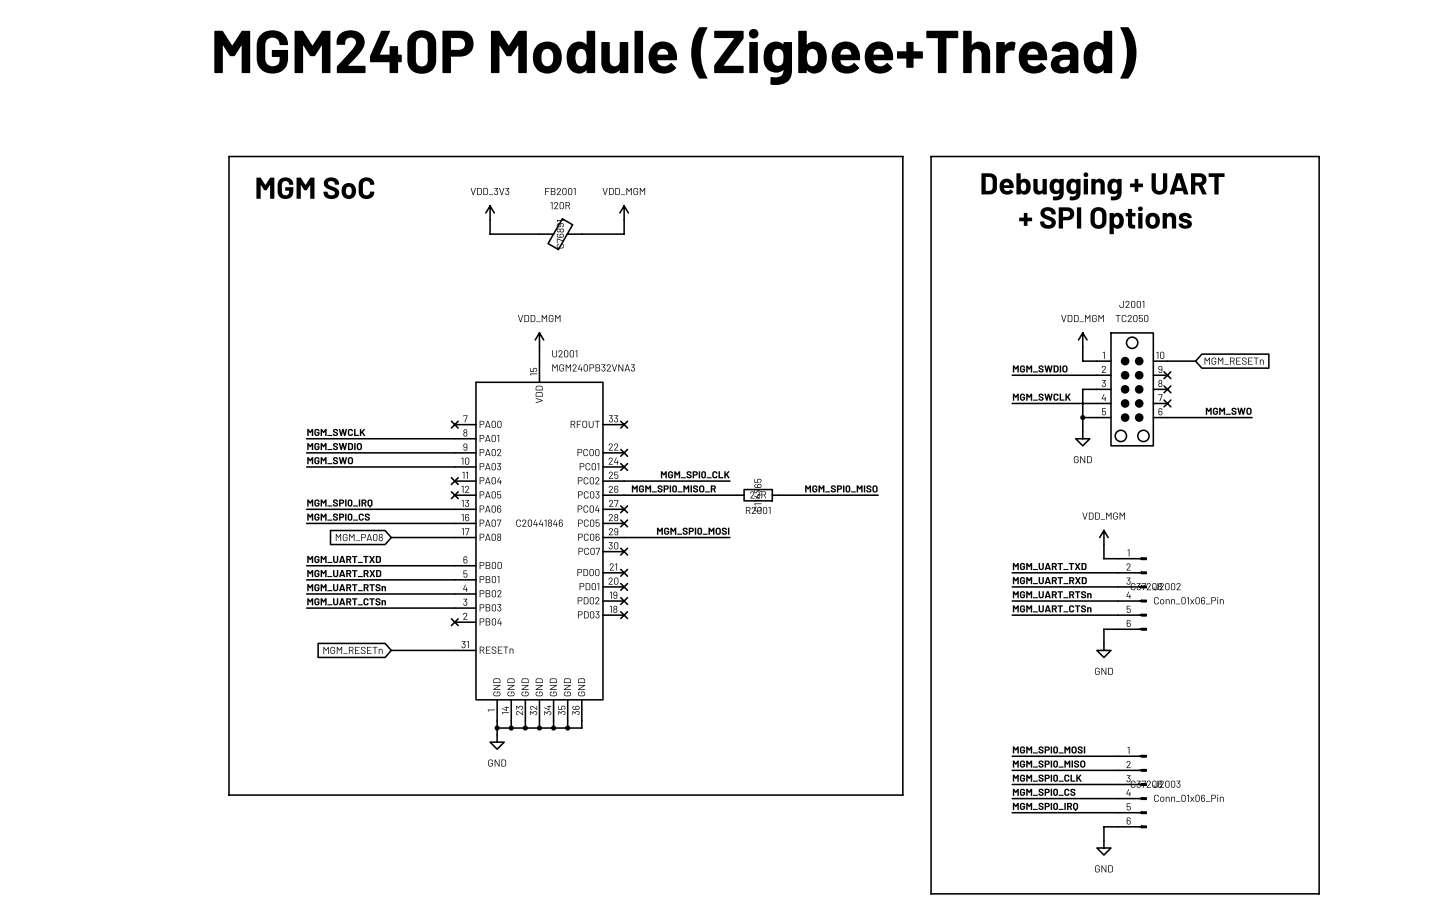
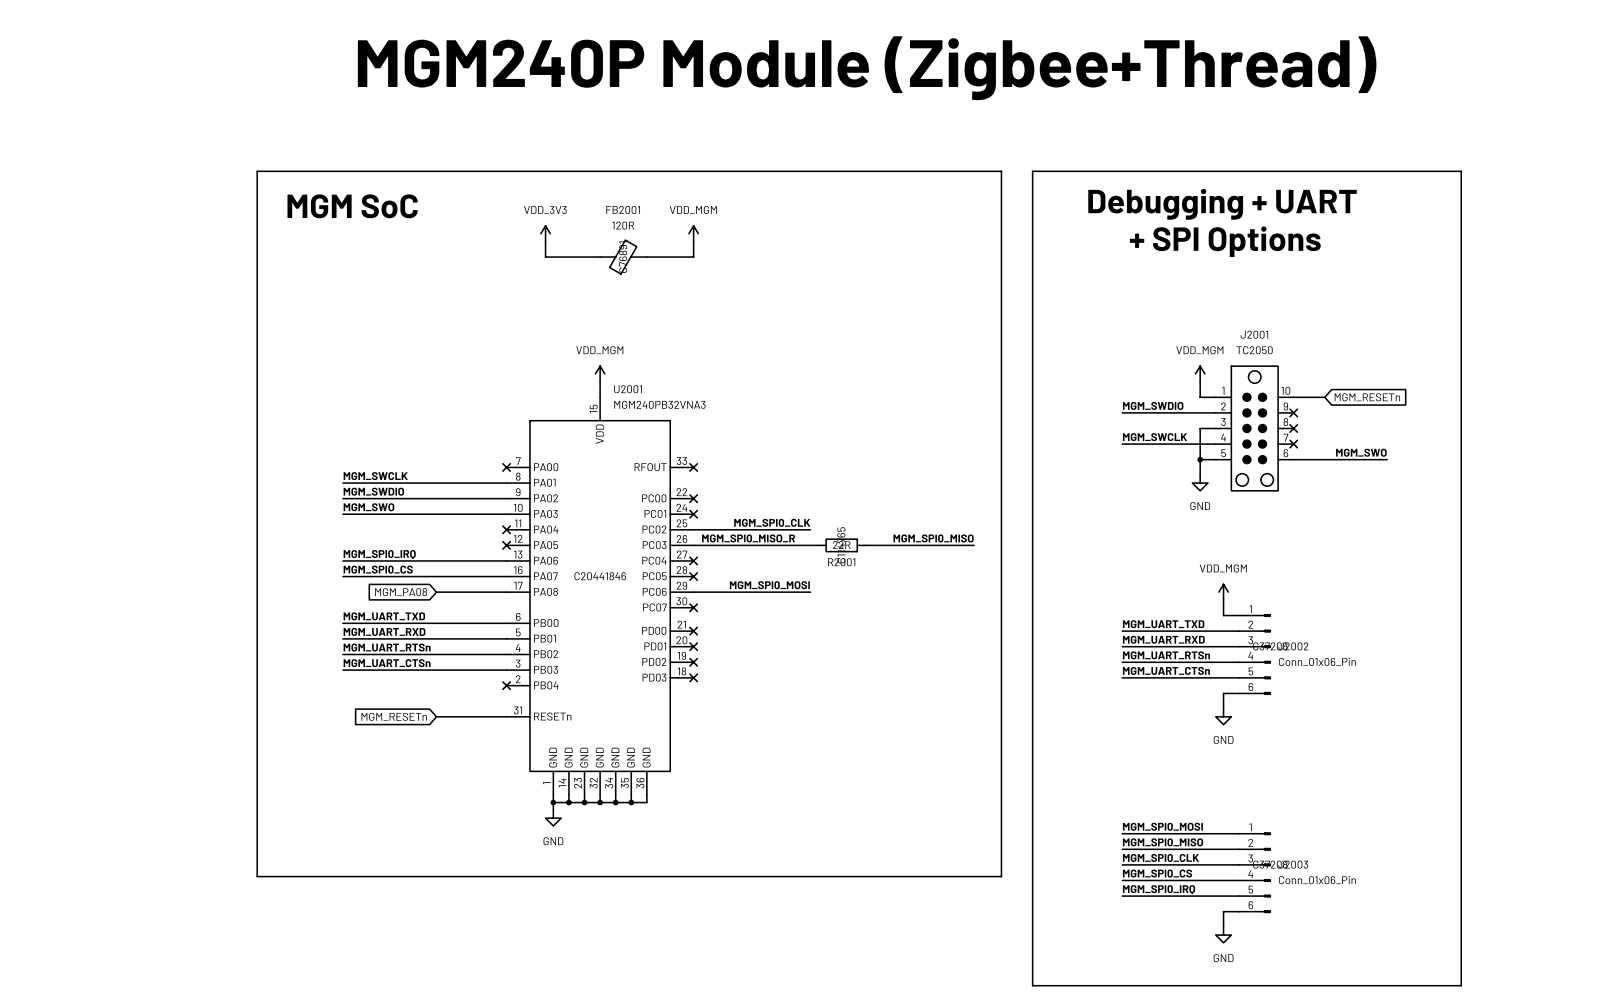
text position: MGM240P Module (Zigbee+Thread) (675, 56) -> MGM240P Module (Zigbee+Thread) (867, 68)

